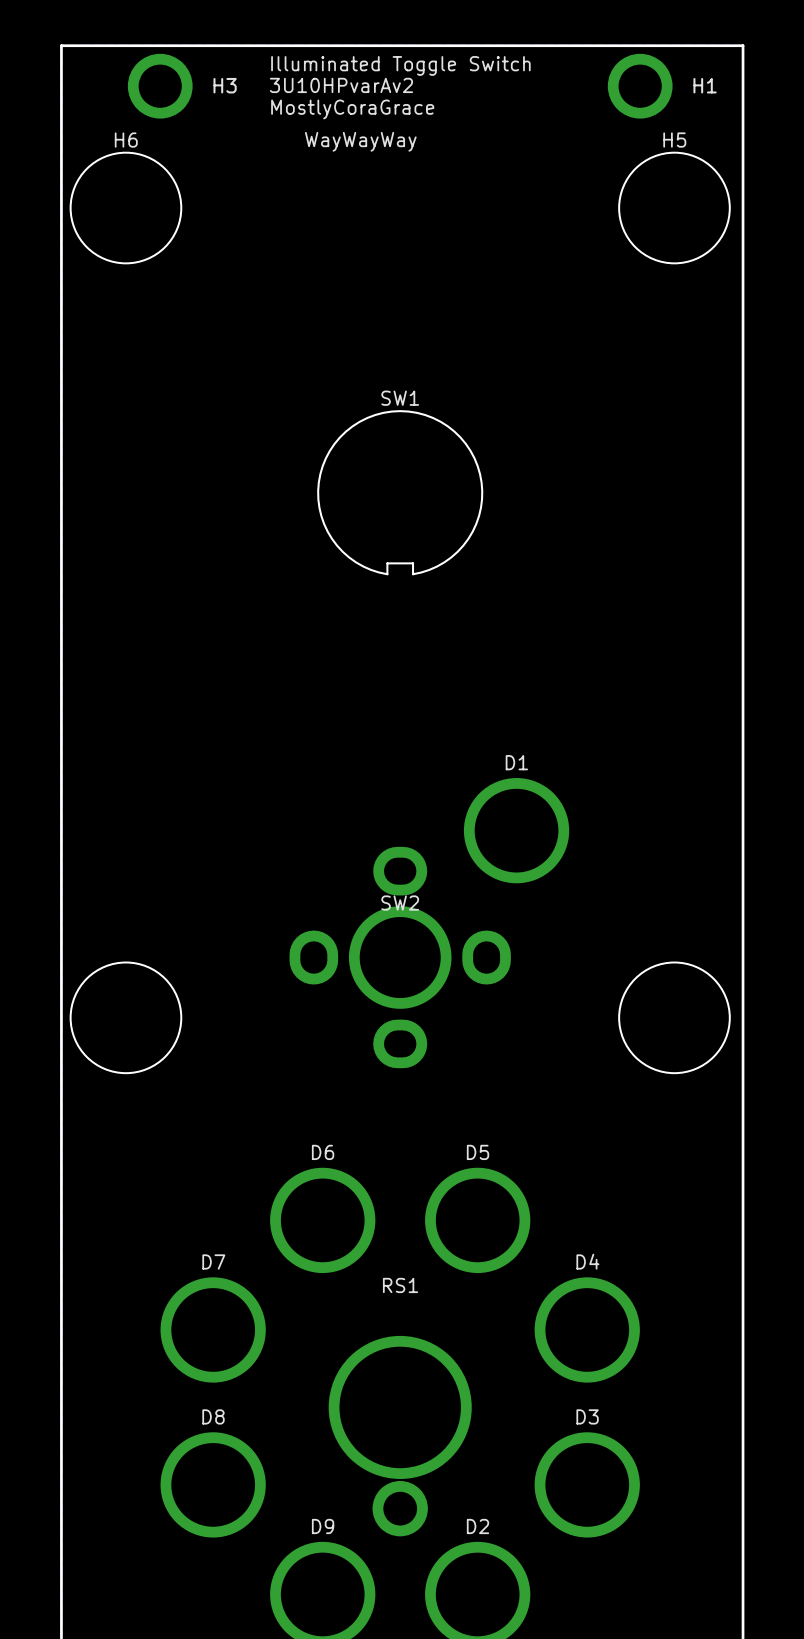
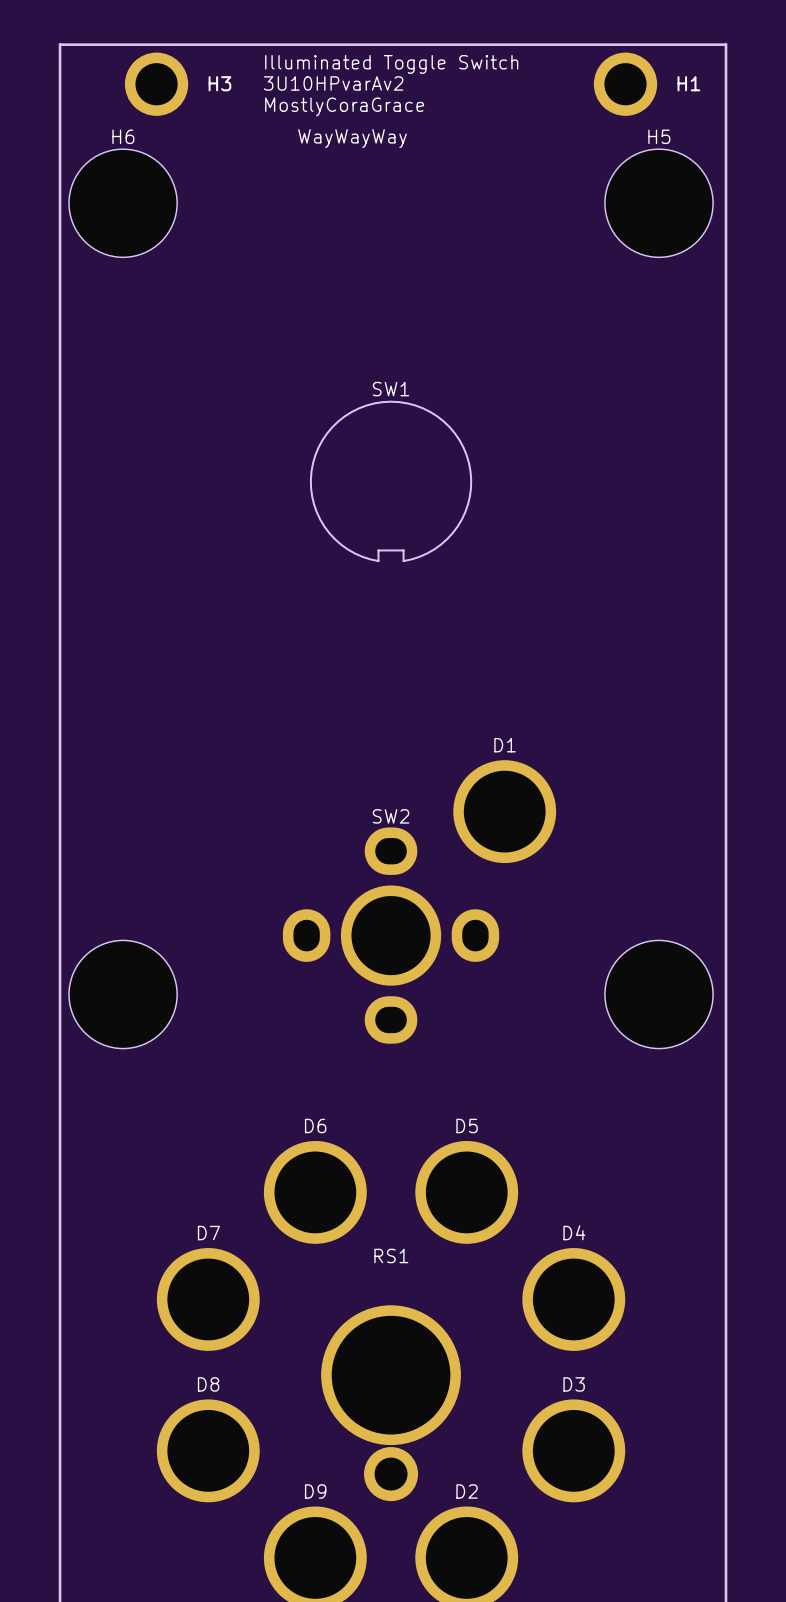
SW2 name position: SW2 (400, 903) -> SW2 (391, 816)

